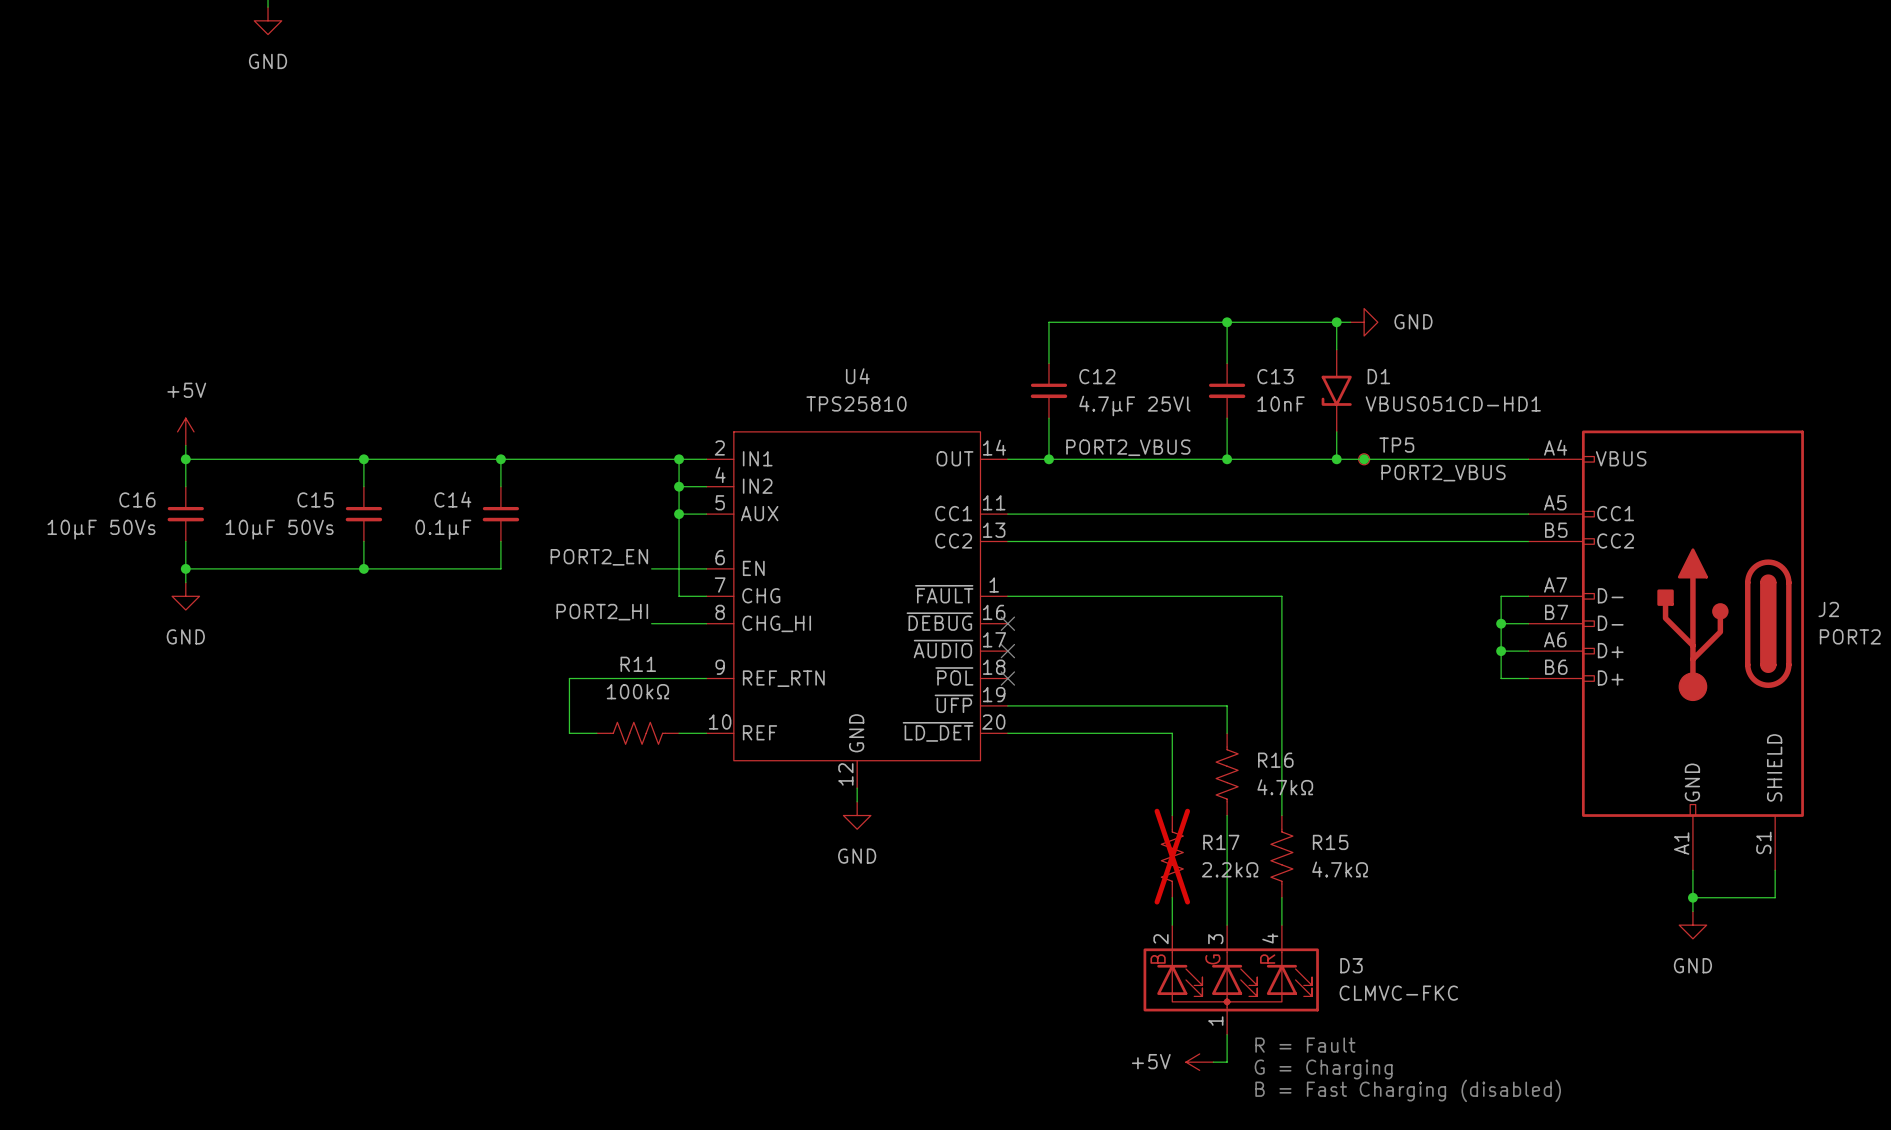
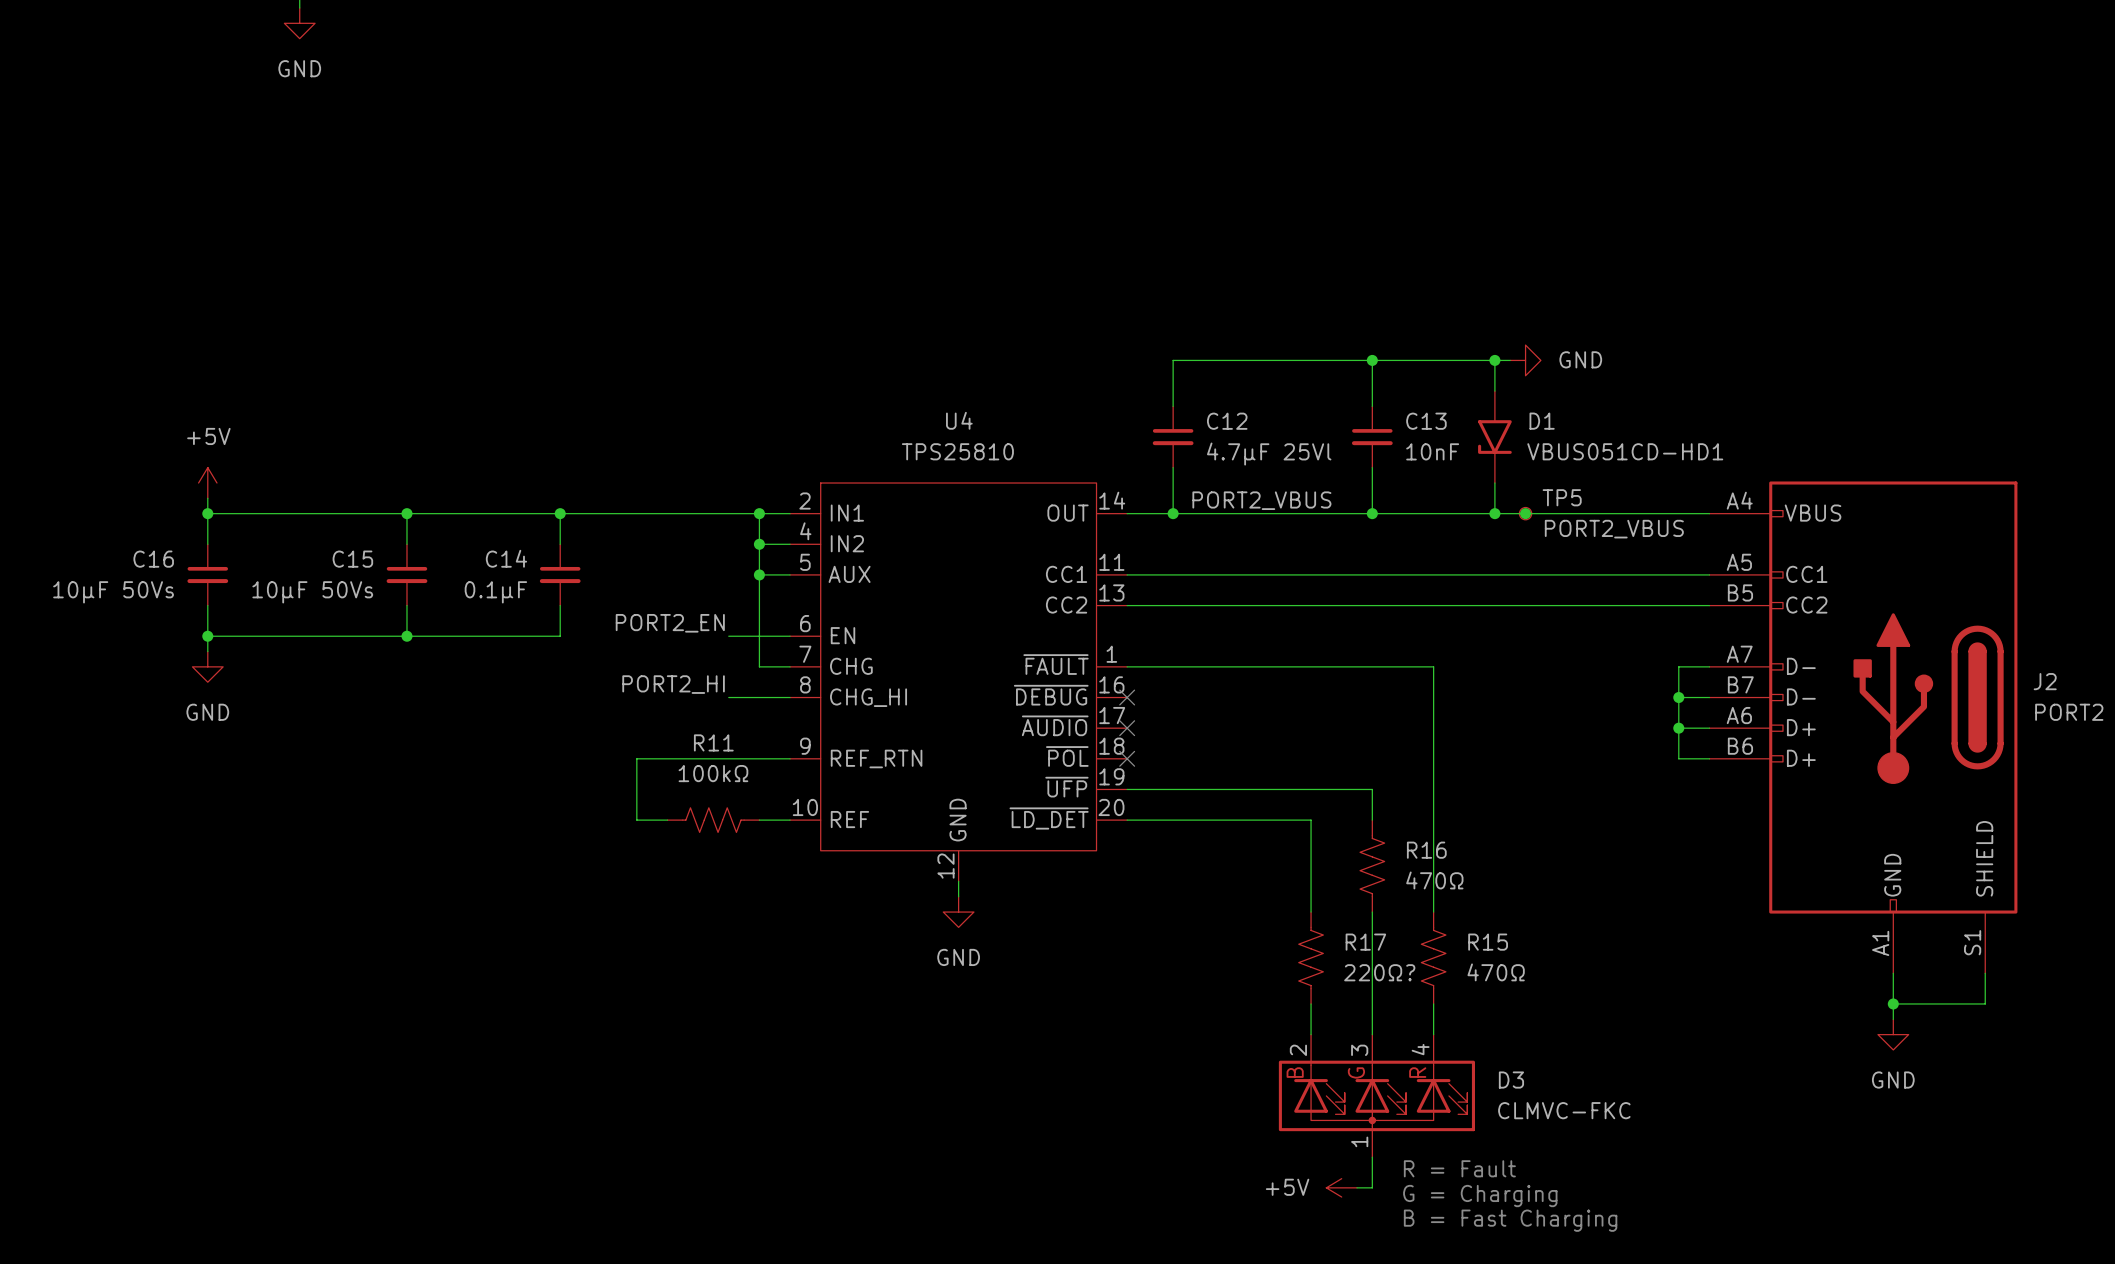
R16 value: 4.7kΩ (1285, 787) -> 470Ω (1434, 880)
R17 do-not-place cross: (1172, 856) -> none
R17 value: 2.2kΩ (1230, 869) -> 220Ω? (1379, 972)
R15 value: 4.7kΩ (1340, 869) -> 470Ω (1496, 972)
text: B = Fast Charging (disabled) (1408, 1090) -> B = Fast Charging (1510, 1220)

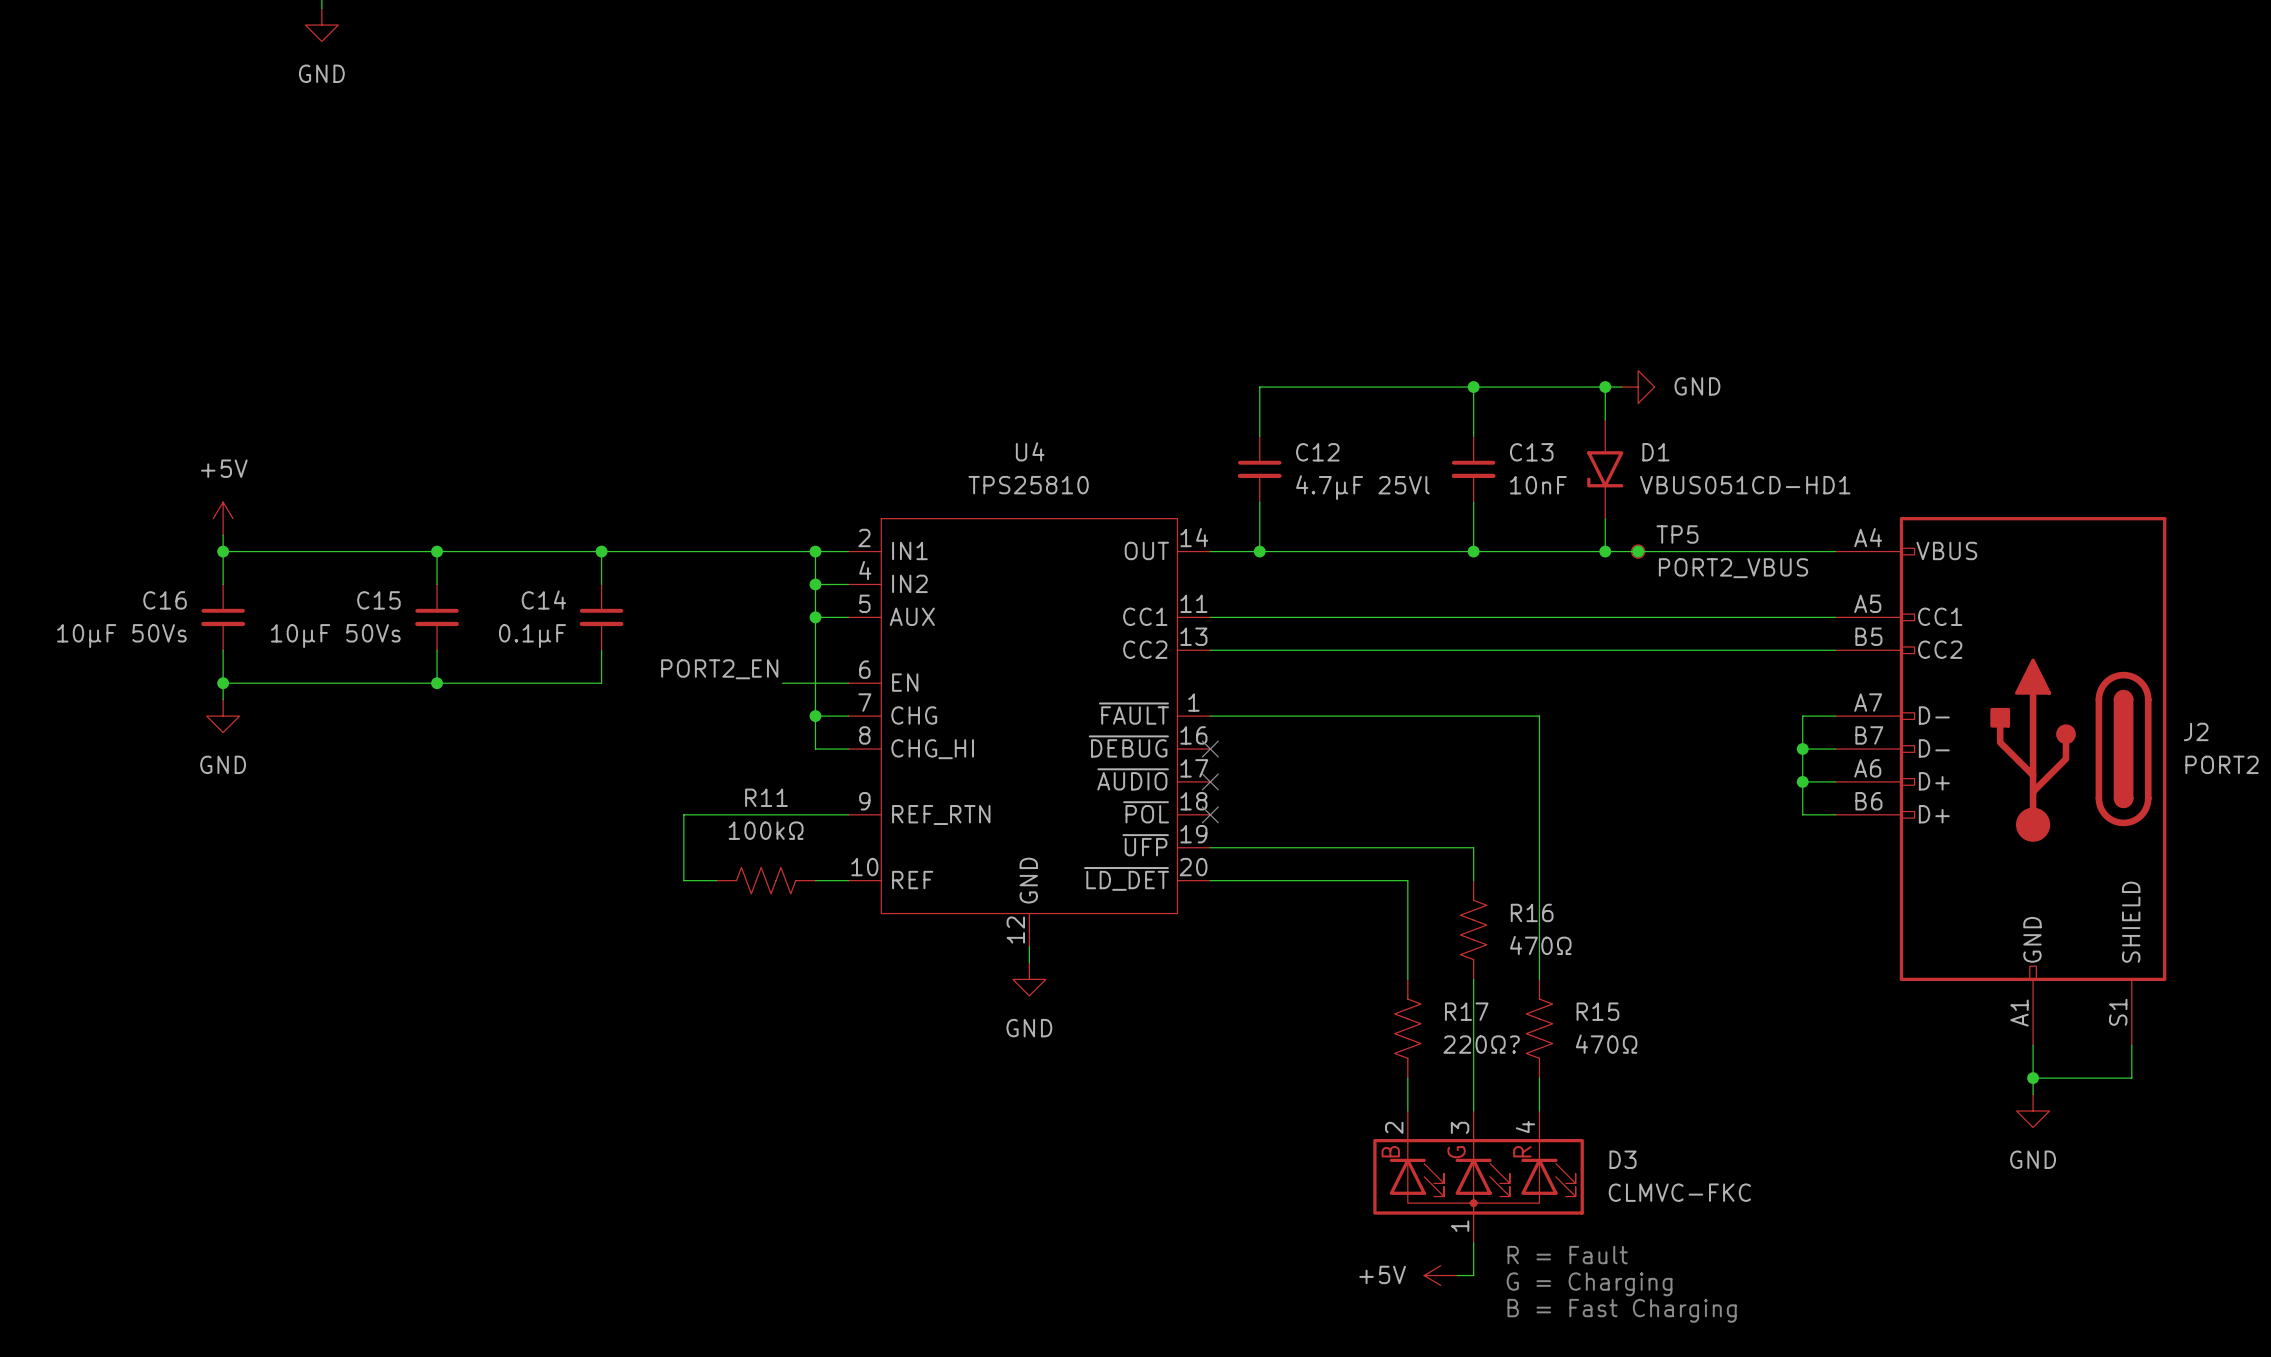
label: PORT2_VBUS (1261, 500) -> none
junction: none -> (815, 716)
label: PORT2_HI (673, 684) -> none
wire: (728, 697) (759, 697) -> (815, 716) (815, 749)

